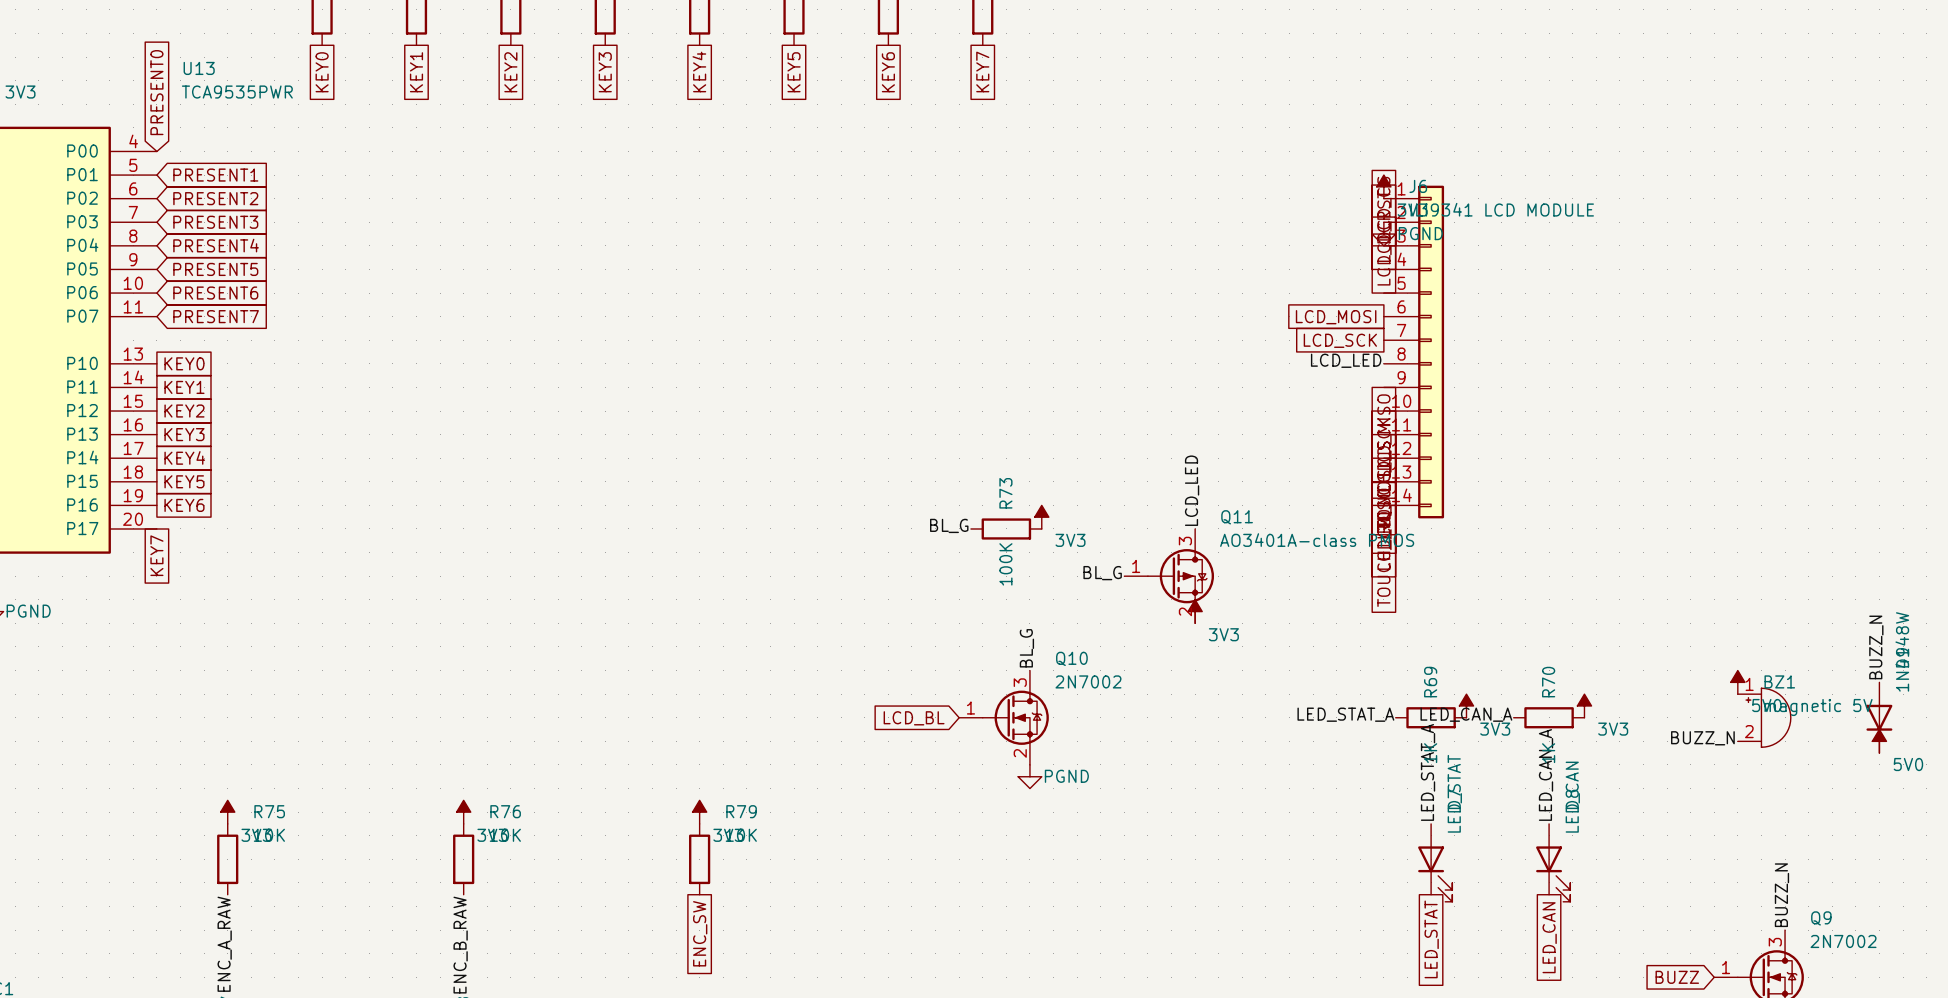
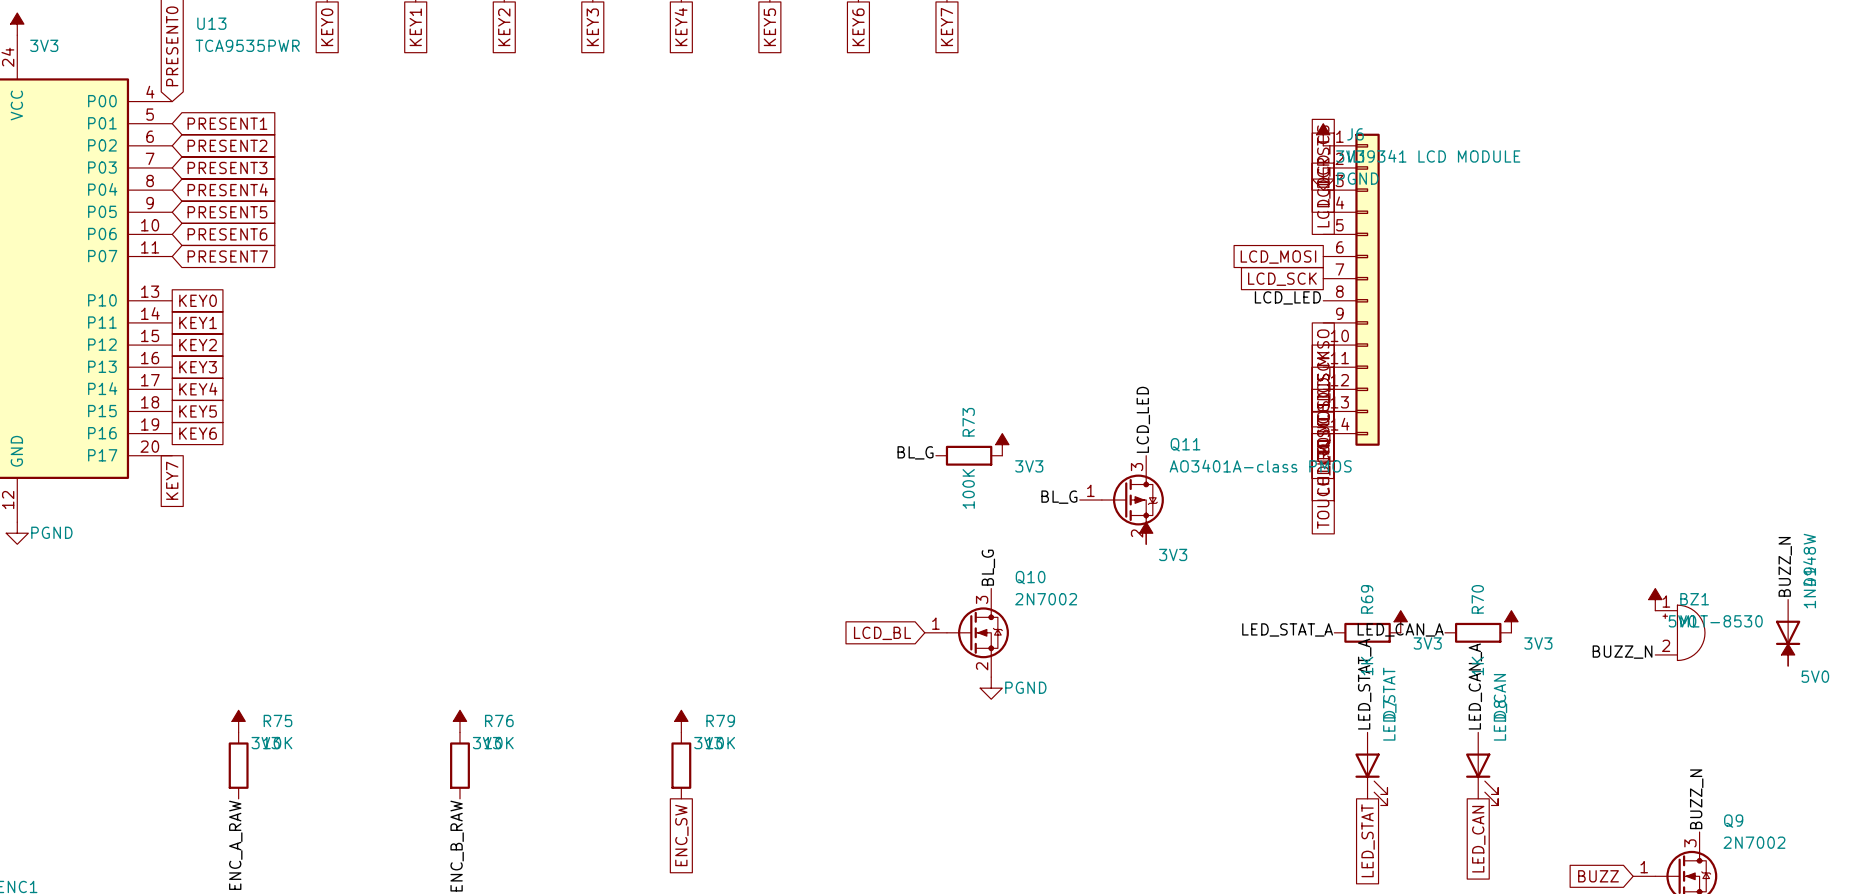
BZ1 value: magnetic 5V (1818, 707) -> MLT-8530 (1721, 621)

